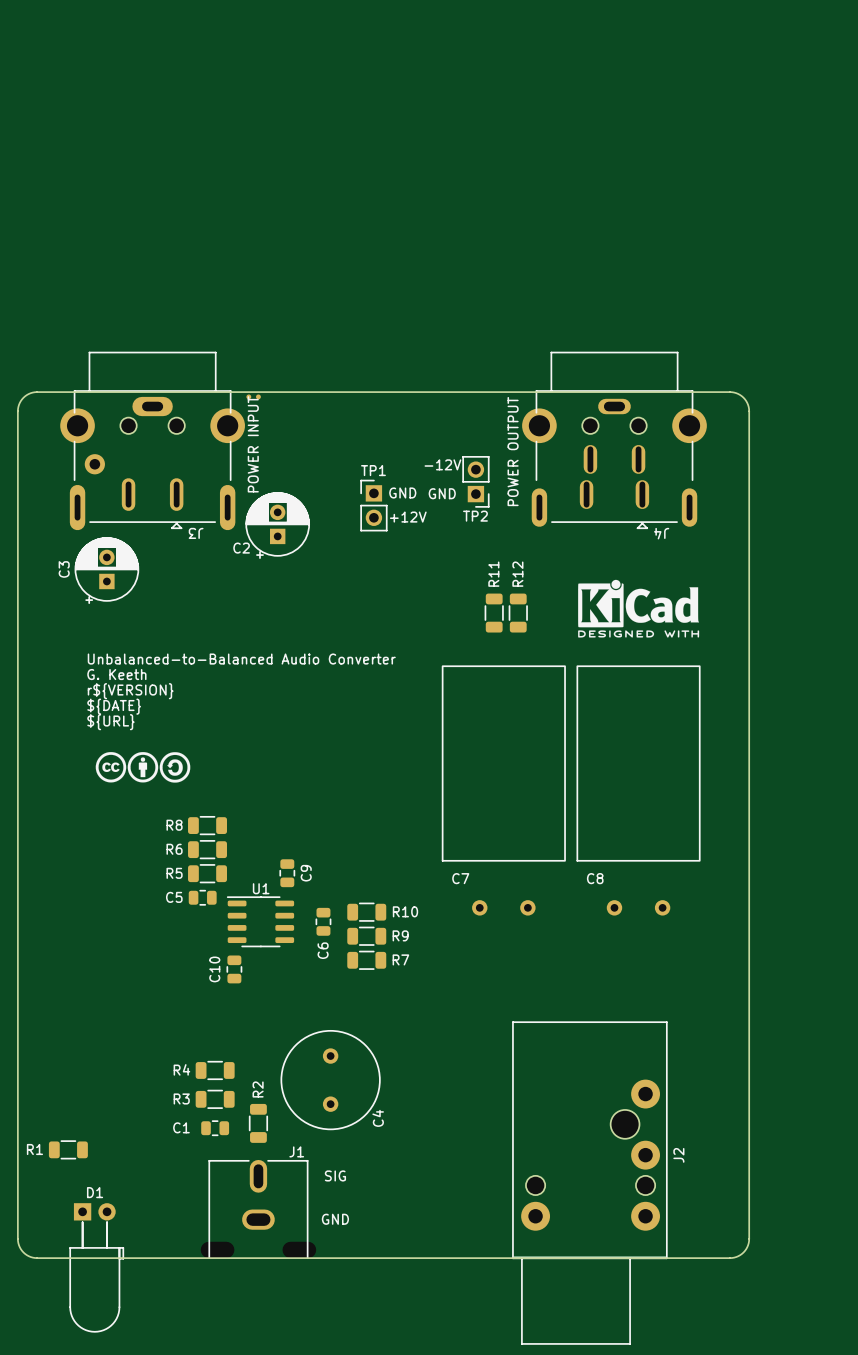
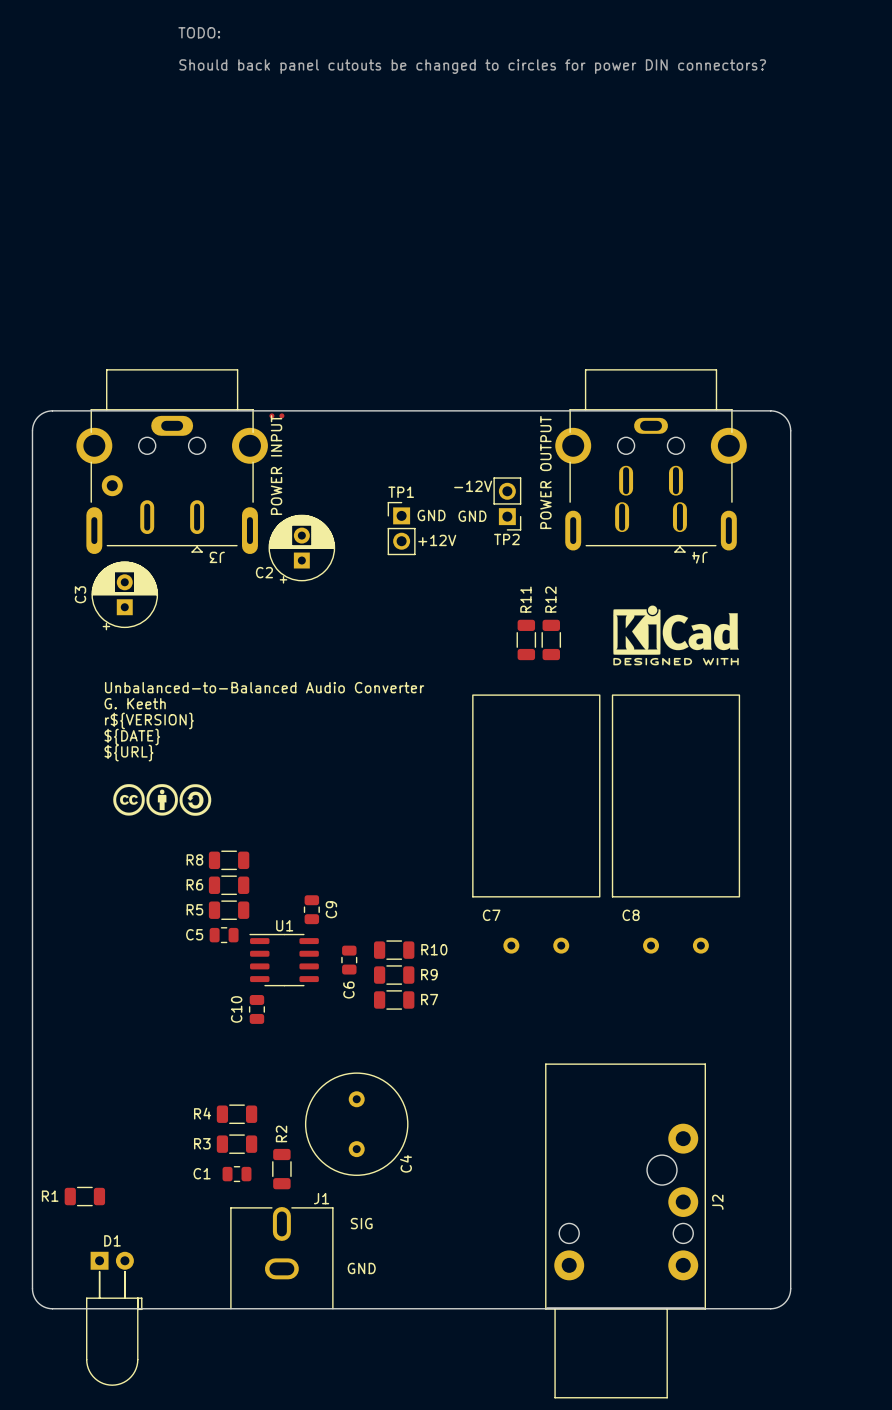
text: none -> TODO: (199, 32)
text: none -> Should back panel cutouts be changed to circles for power DIN connectors? (472, 66)

